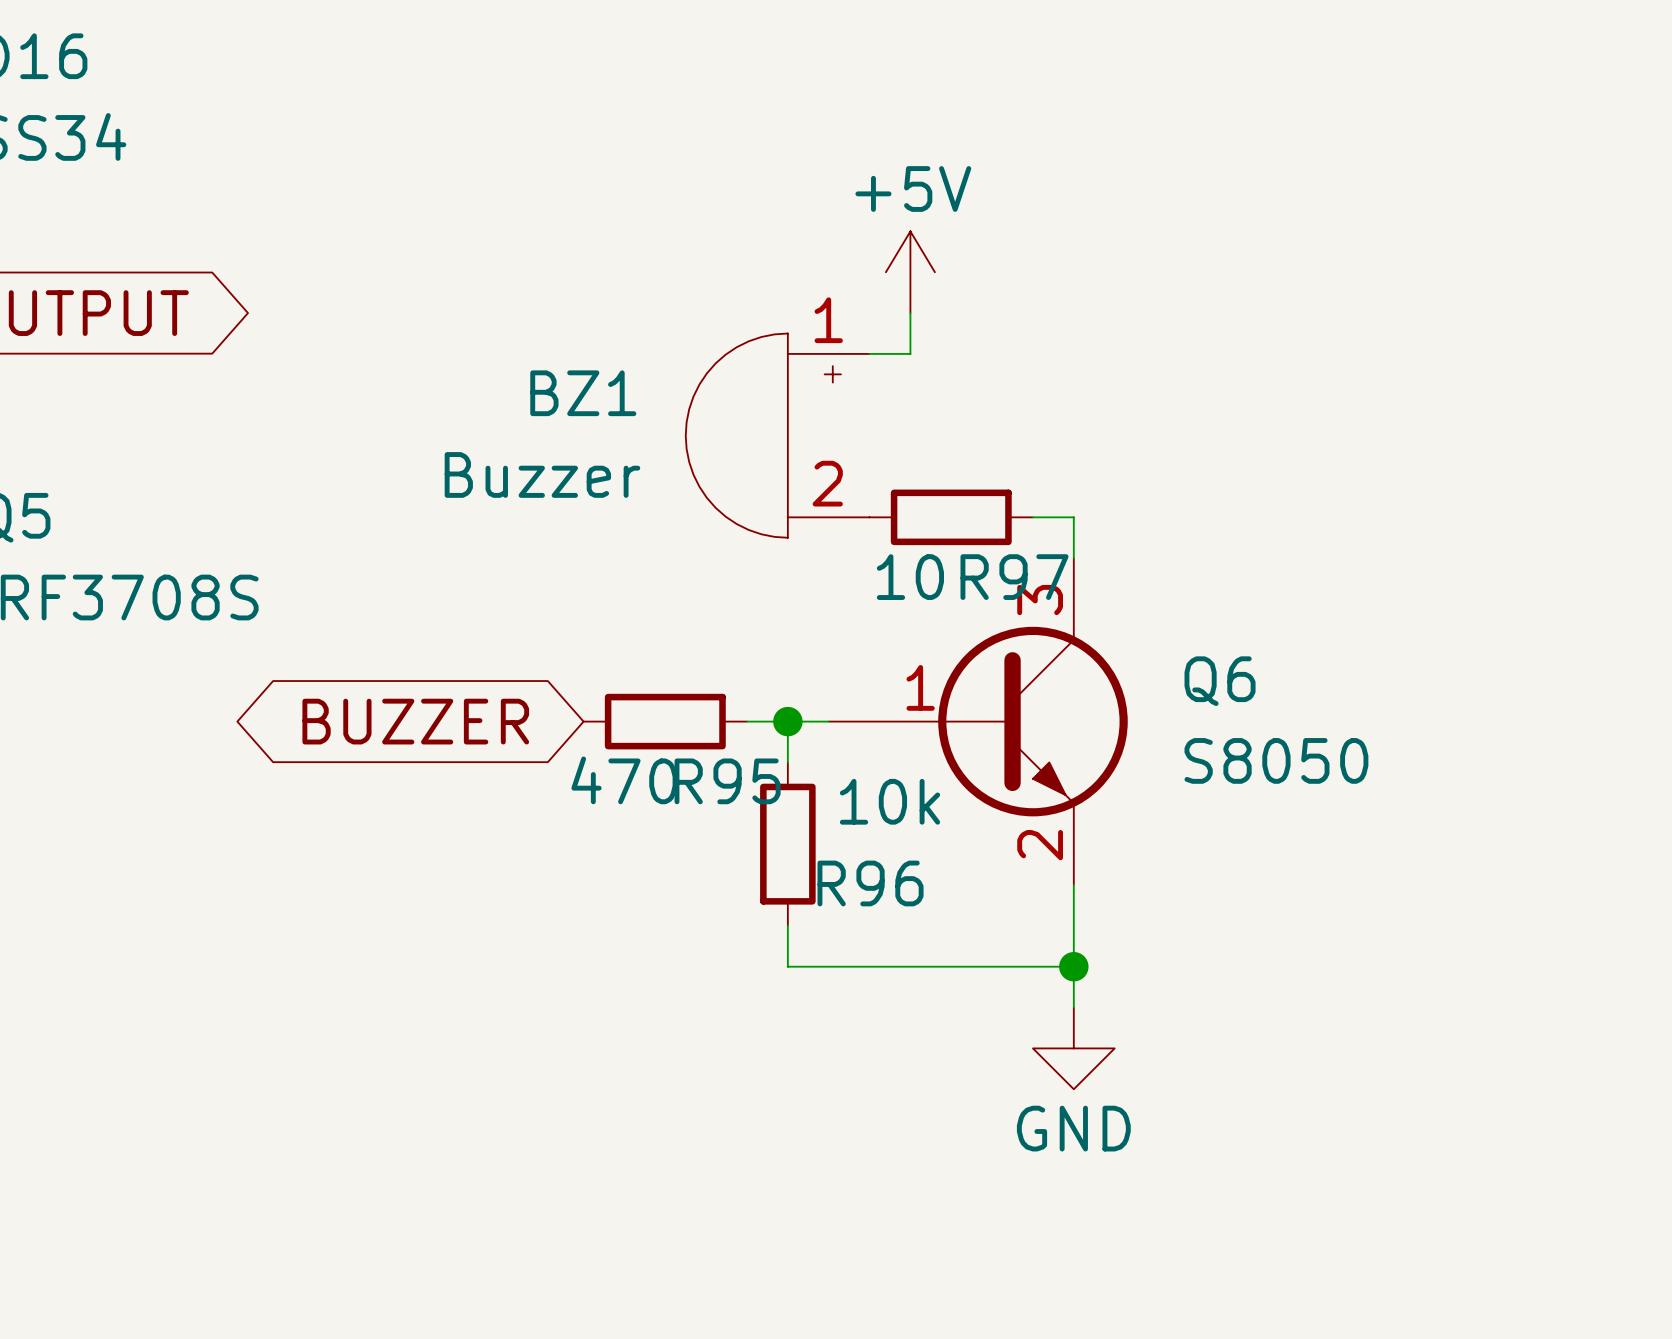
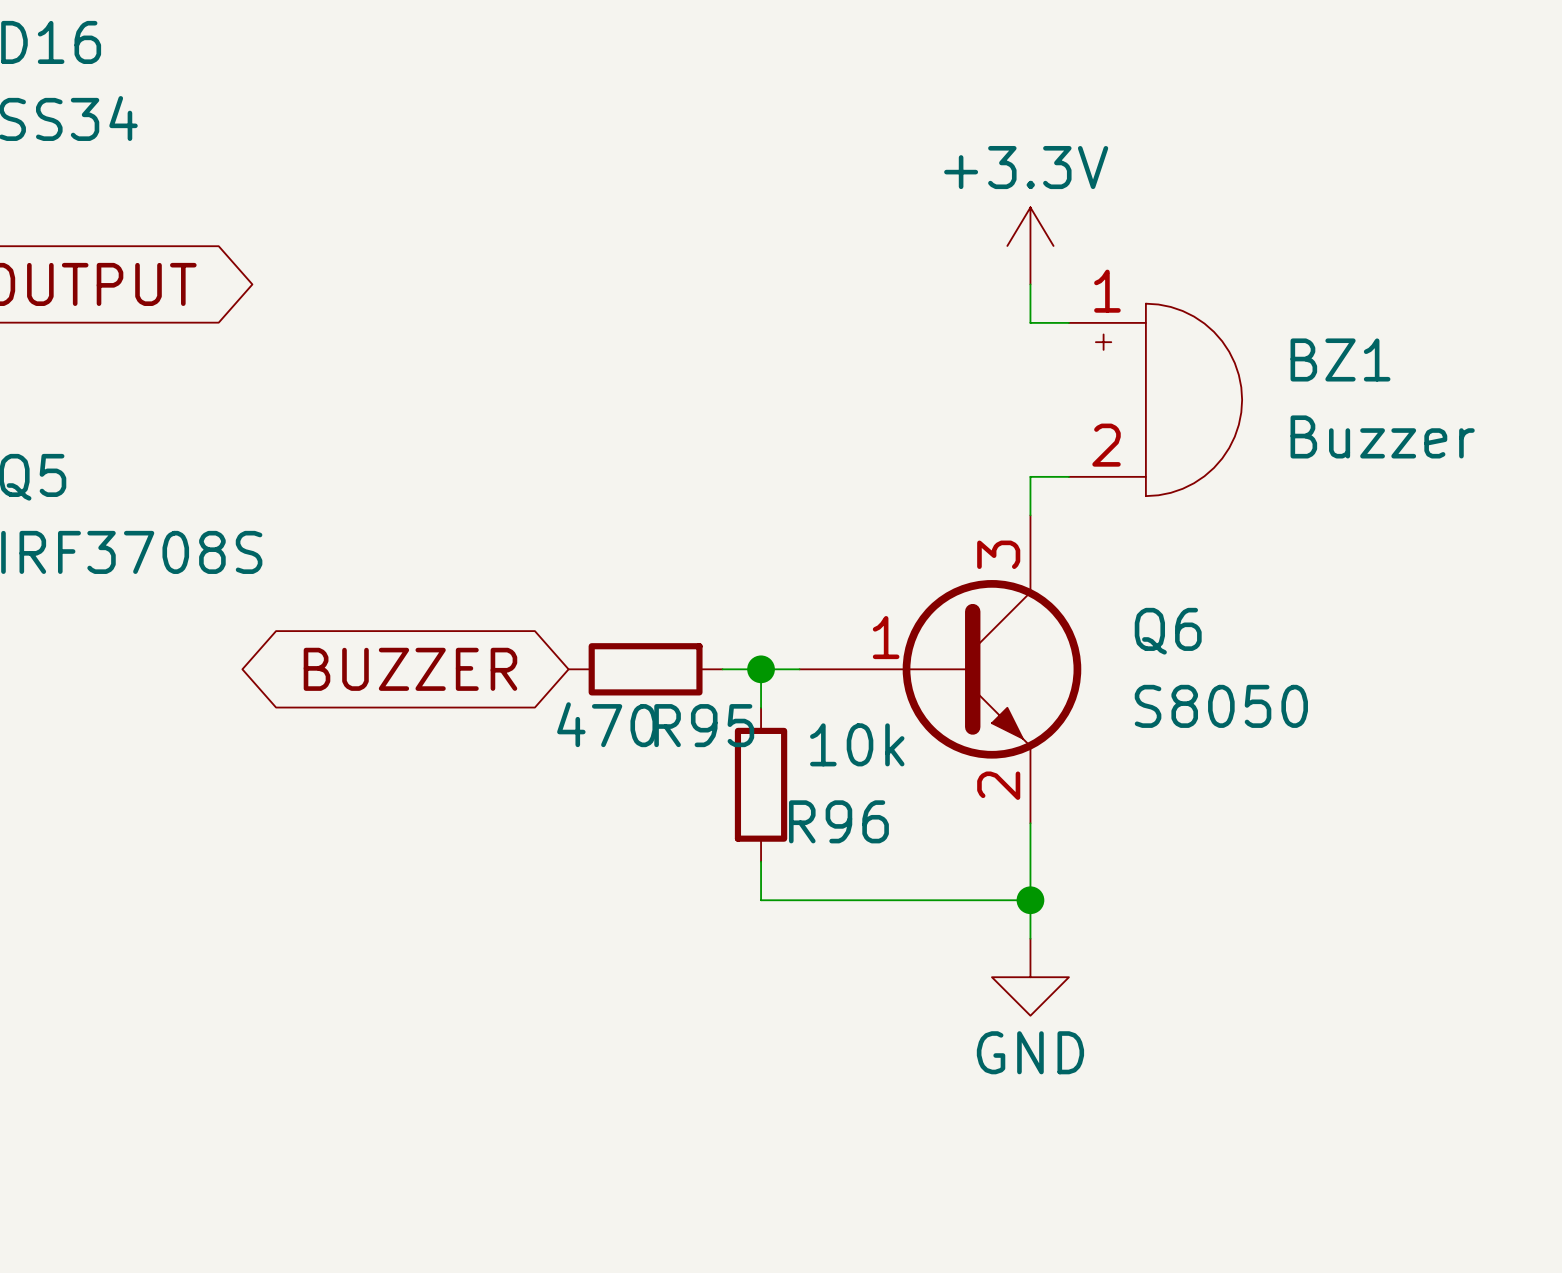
power symbol: +5V (910, 272) -> none
power symbol: none -> +3.3V (1030, 245)
wire: (910, 313) (910, 353) (869, 353) -> none
wire: none -> (1030, 284) (1030, 322) (1068, 322)
BZ1 flip: as is (763, 435) -> left-right (1169, 399)
BZ1 position: (777, 435) -> (1155, 399)
R97: 10 (951, 517) -> none
wire: (1032, 517) (1073, 517) -> (1068, 476) (1030, 476)

